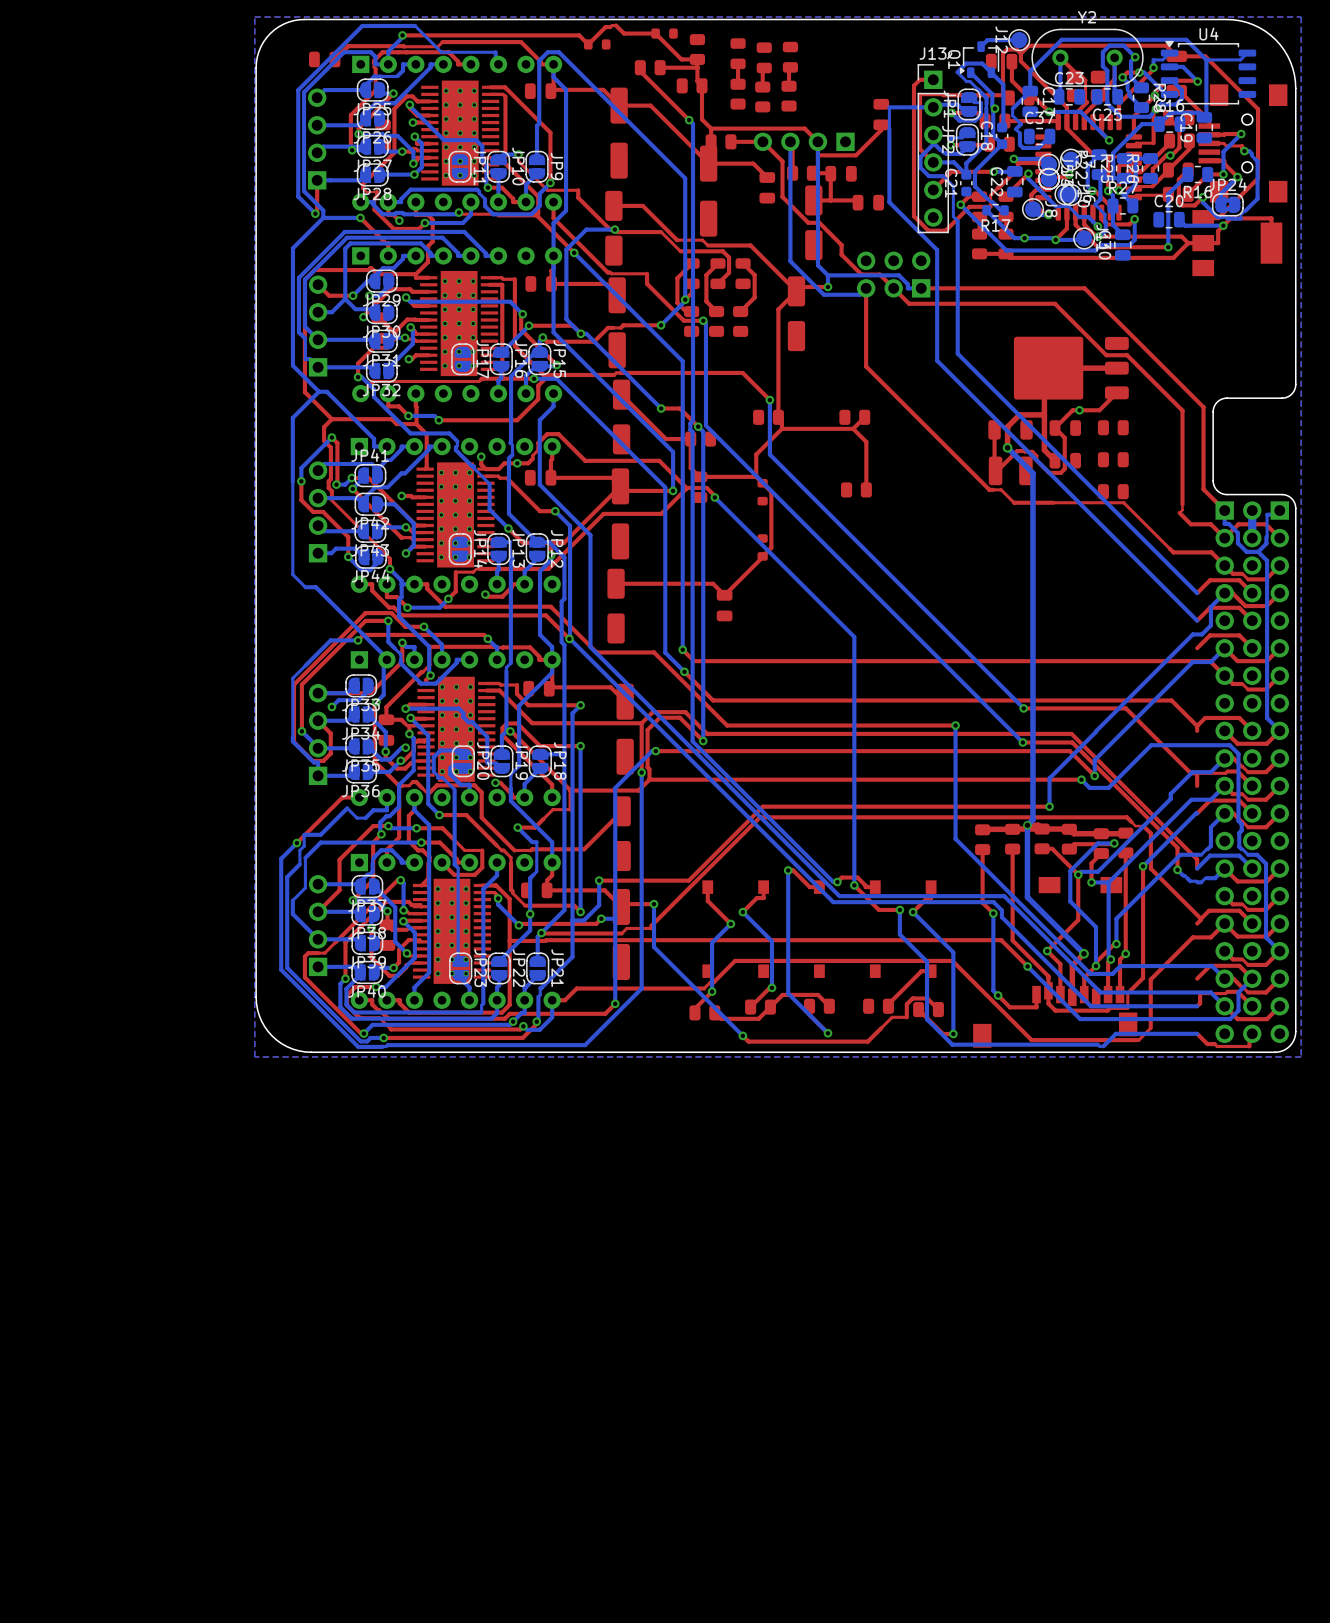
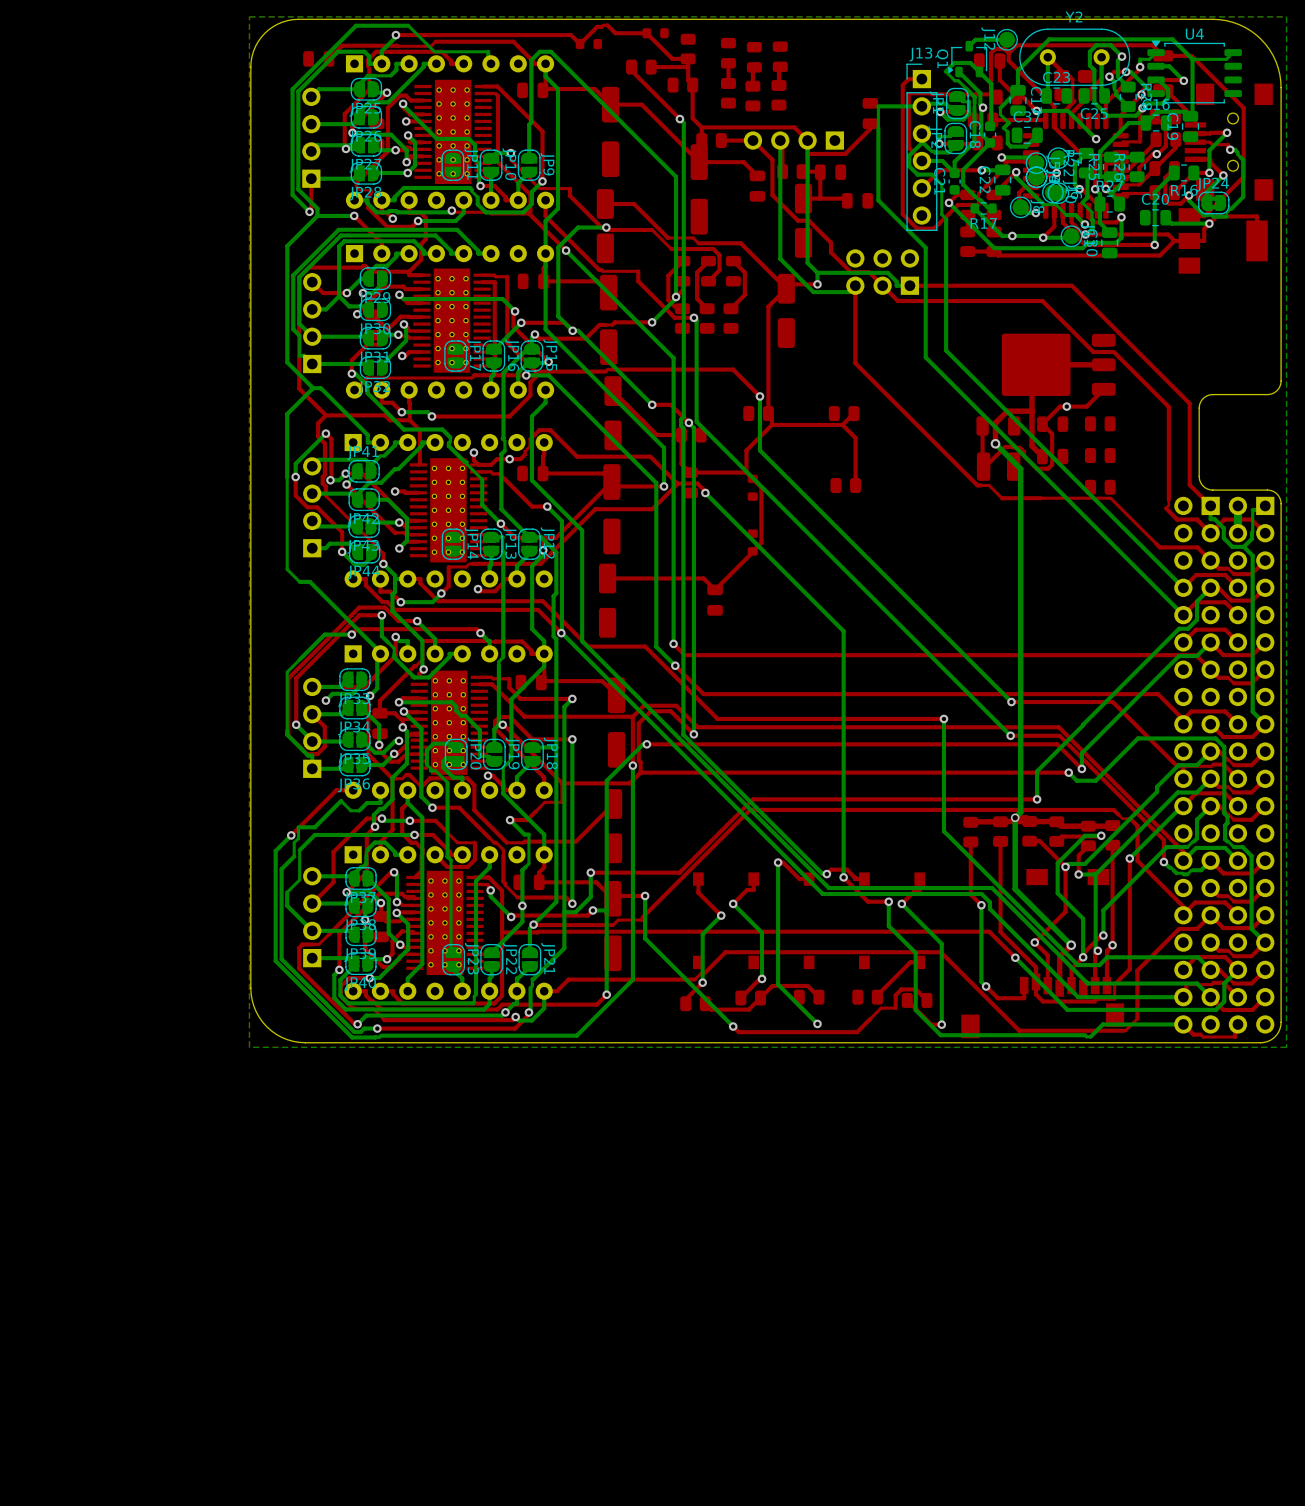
part: none -> (1197, 765)

